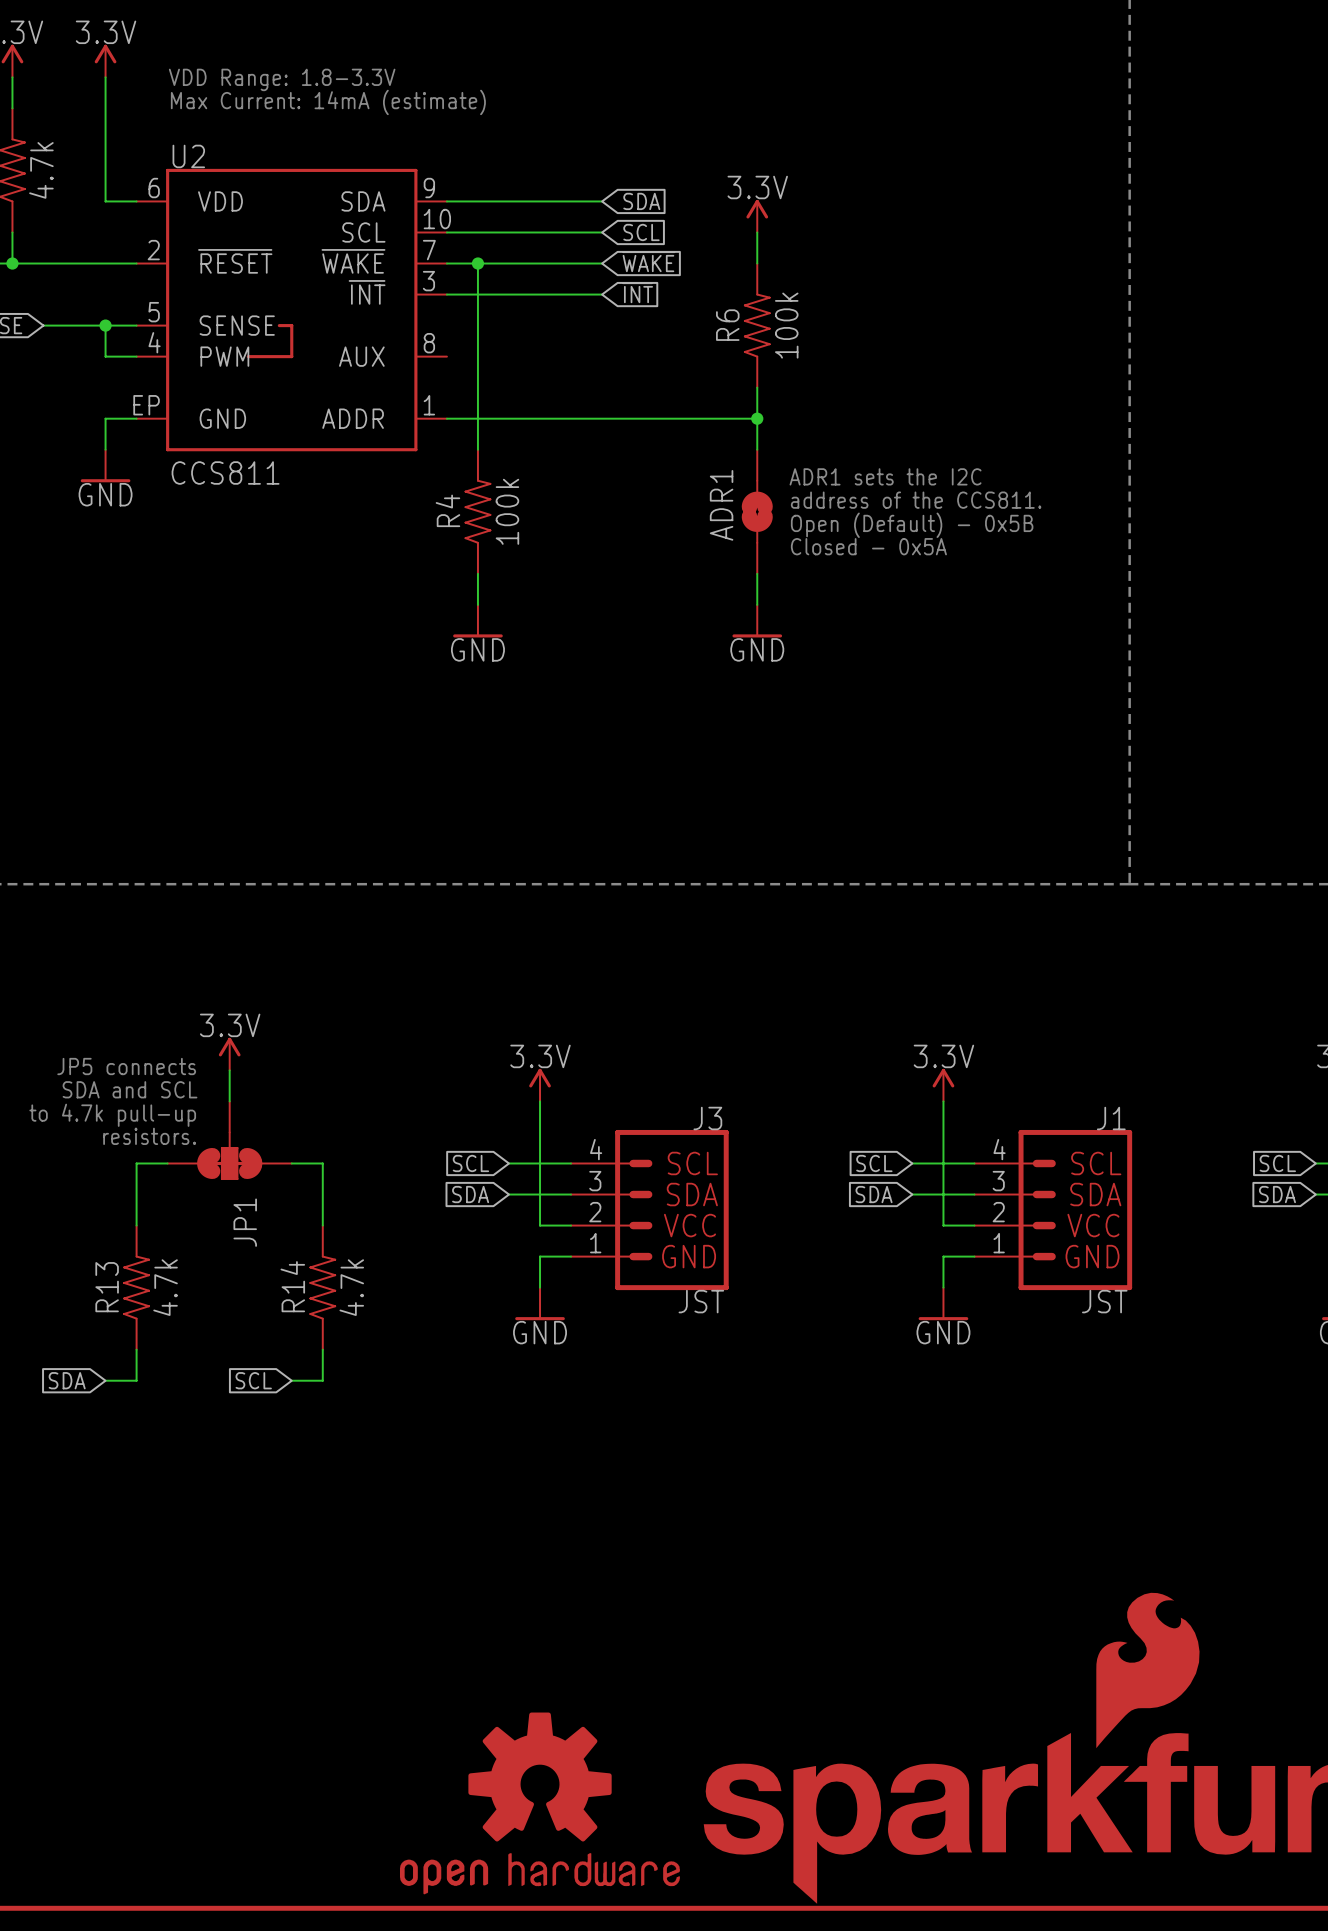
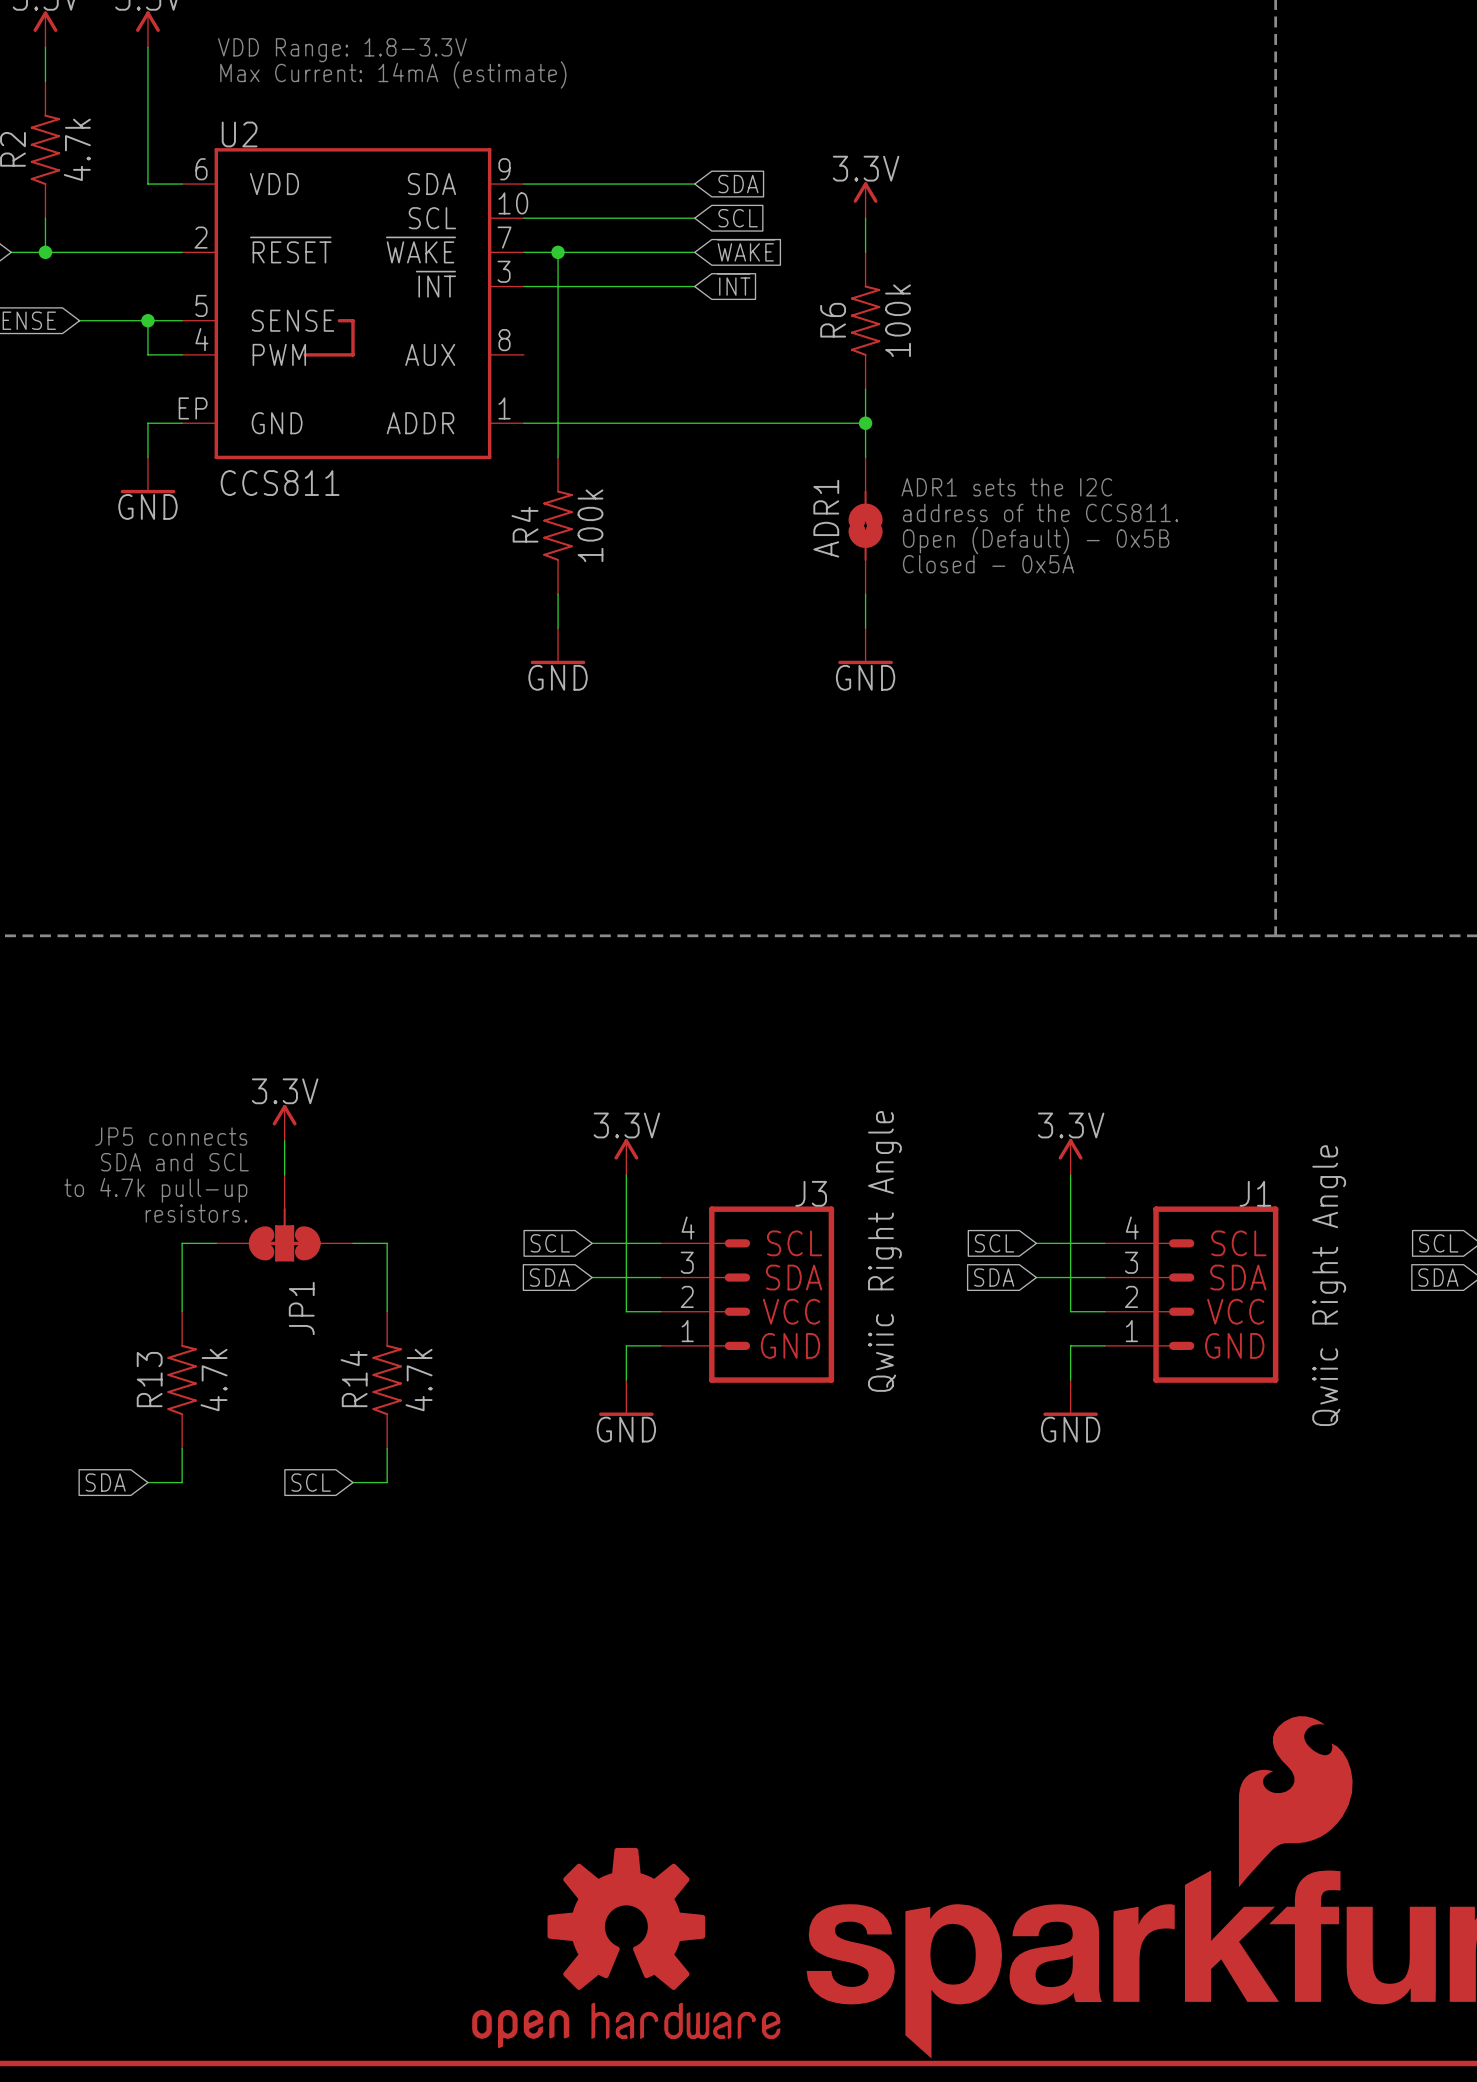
J3 value: JST (701, 1301) -> Qwiic Right Angle (884, 1251)
J1 value: JST (1104, 1301) -> Qwiic Right Angle (1329, 1285)

